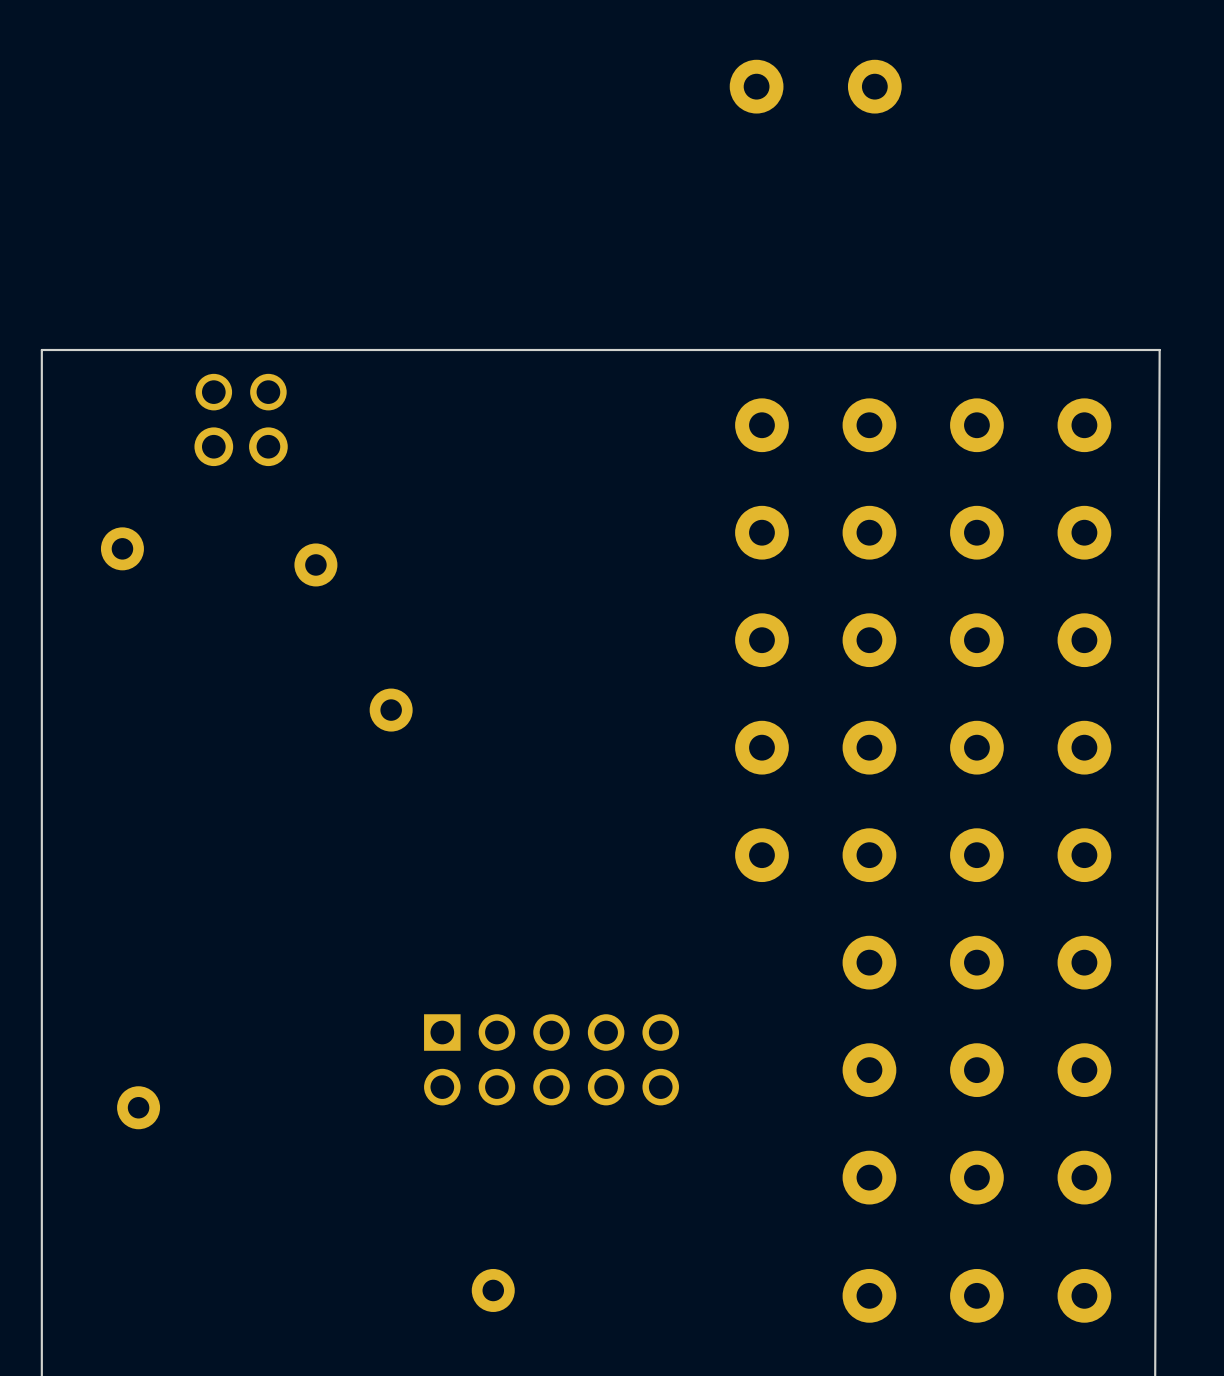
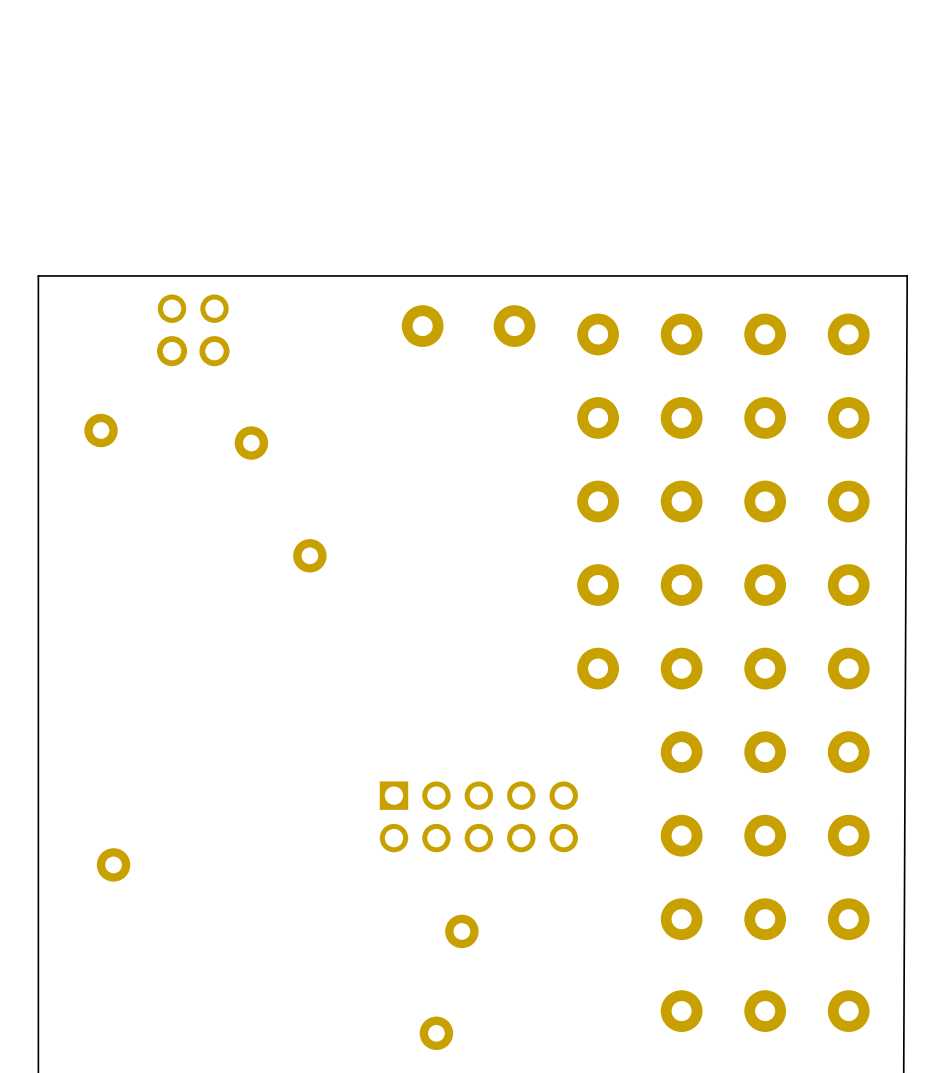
part: (756, 86) -> none
part: (874, 86) -> none
part: none -> (422, 326)
part: none -> (514, 326)
part position: (551, 1059) -> (478, 816)
part: none -> (461, 931)
part: (493, 1290) -> none
part: none -> (436, 1033)

